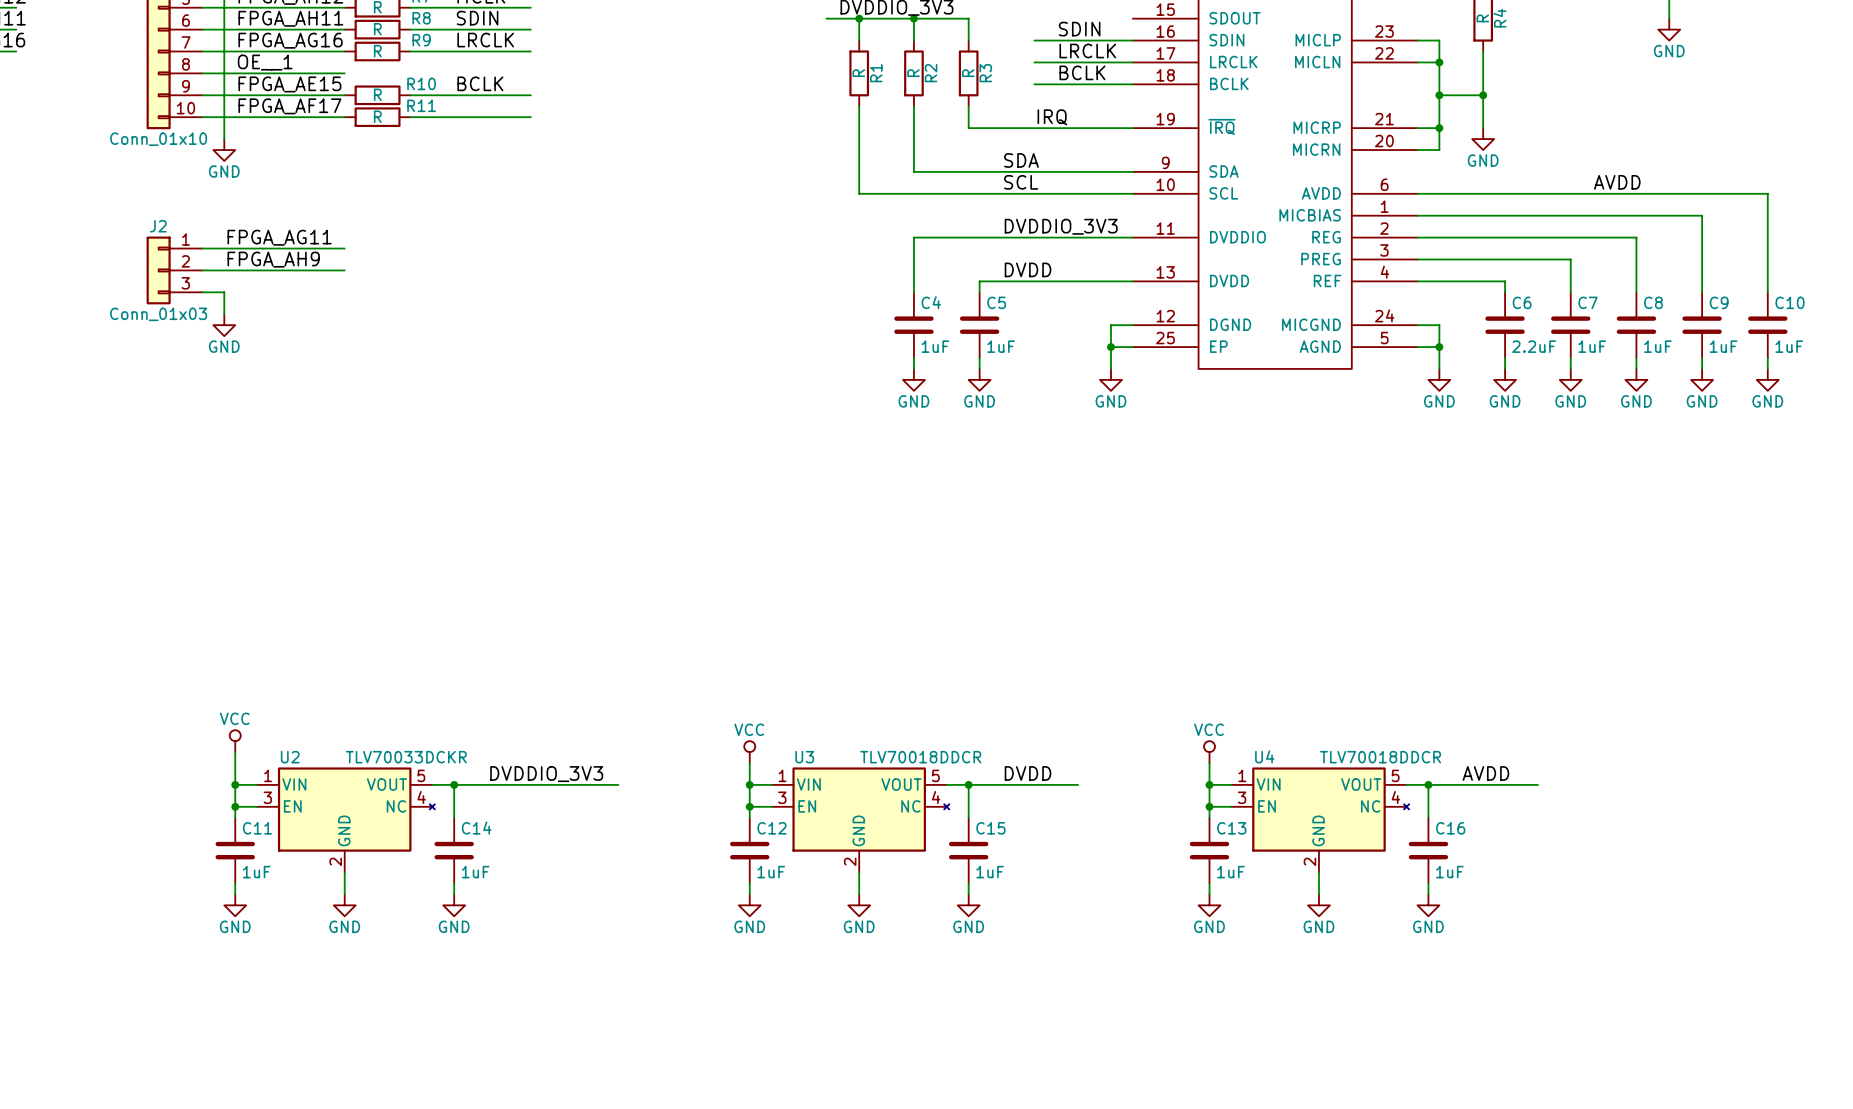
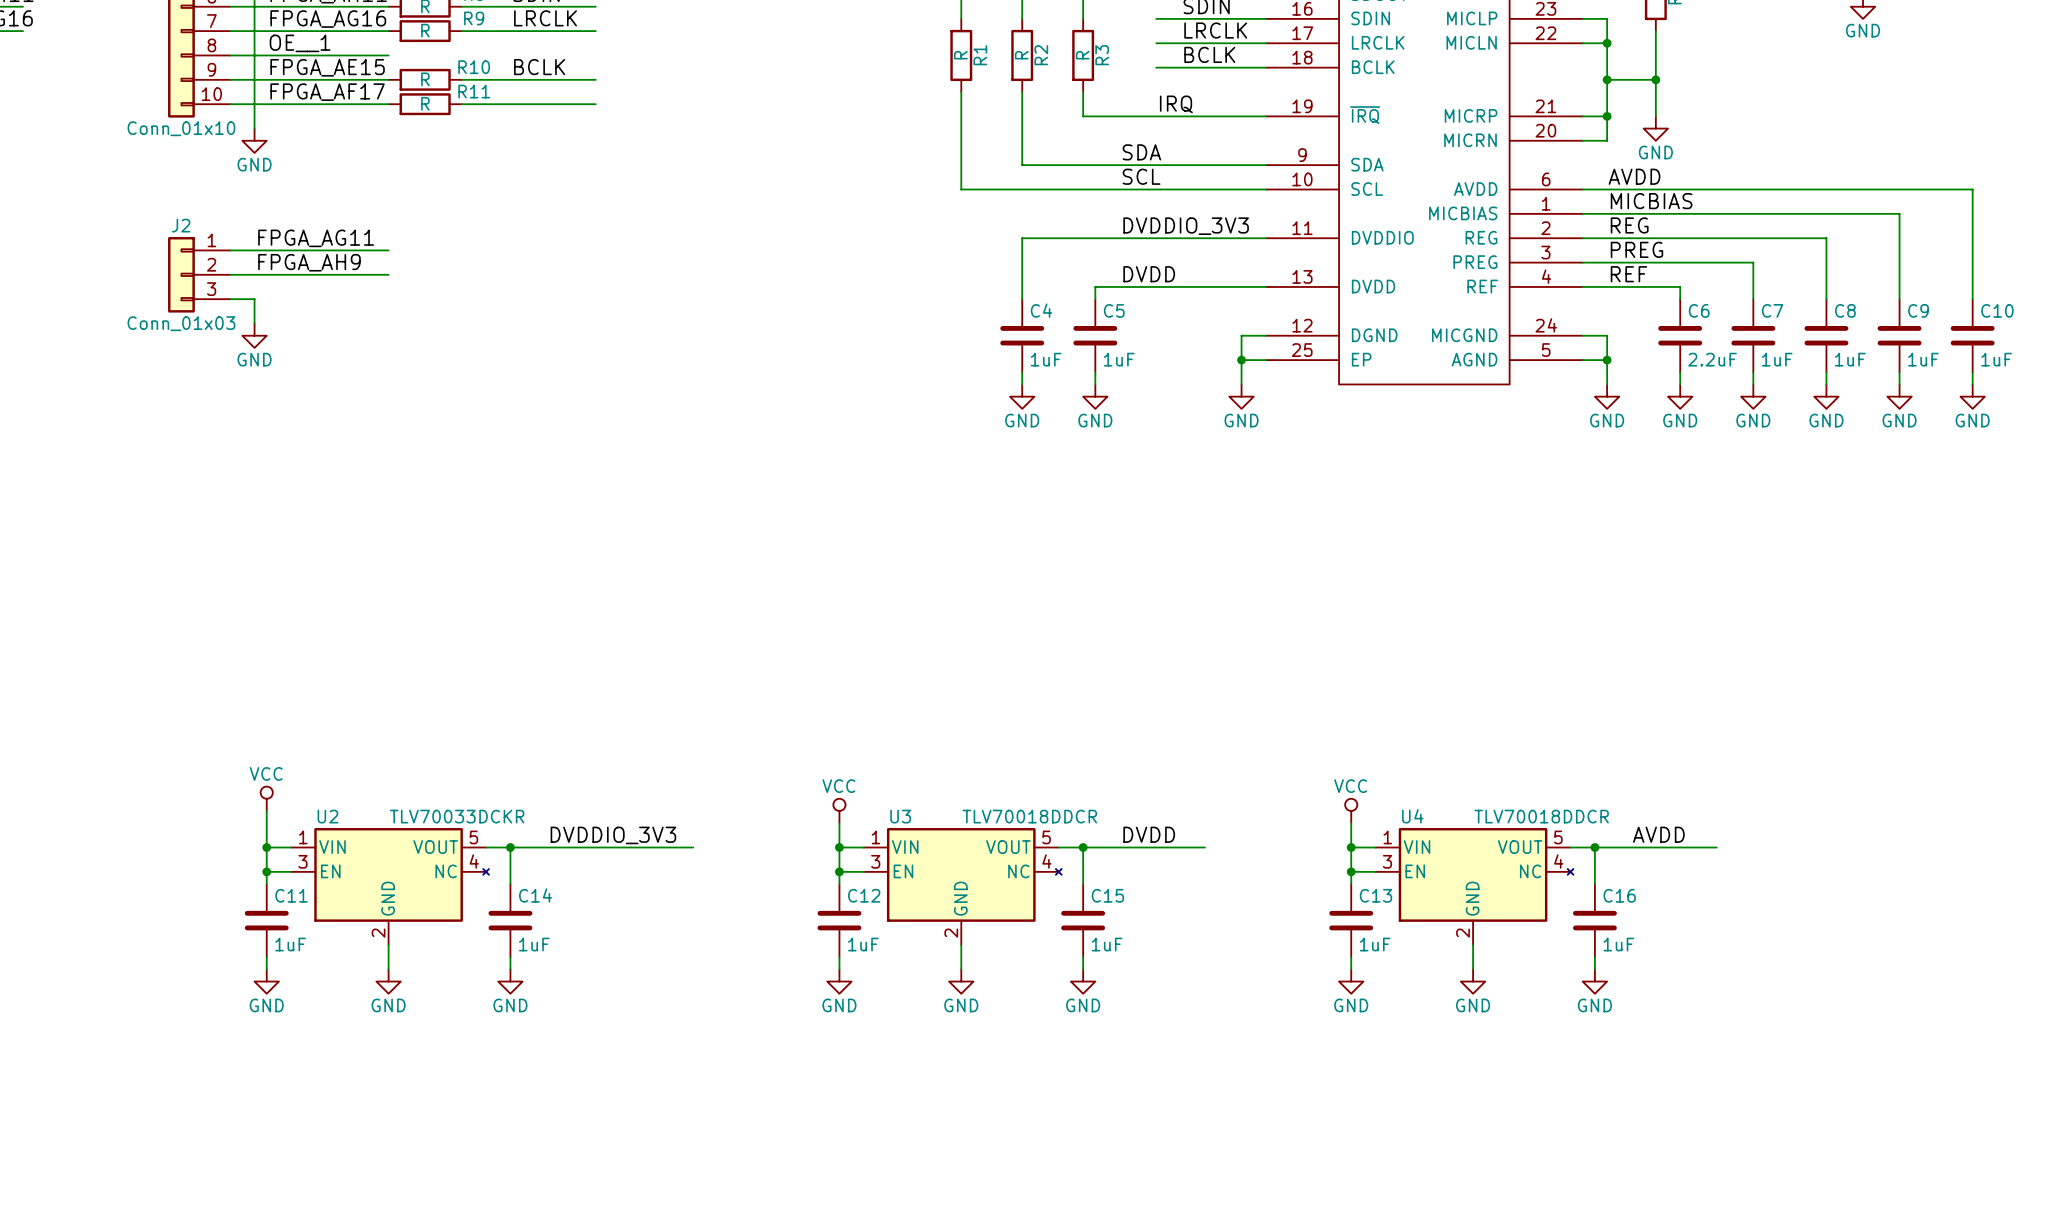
label position: AVDD (1617, 182) -> AVDD (1634, 176)
label: none -> MICBIAS (1651, 201)
label: none -> REG (1629, 225)
label: none -> PREG (1636, 249)
label: none -> REF (1628, 274)

